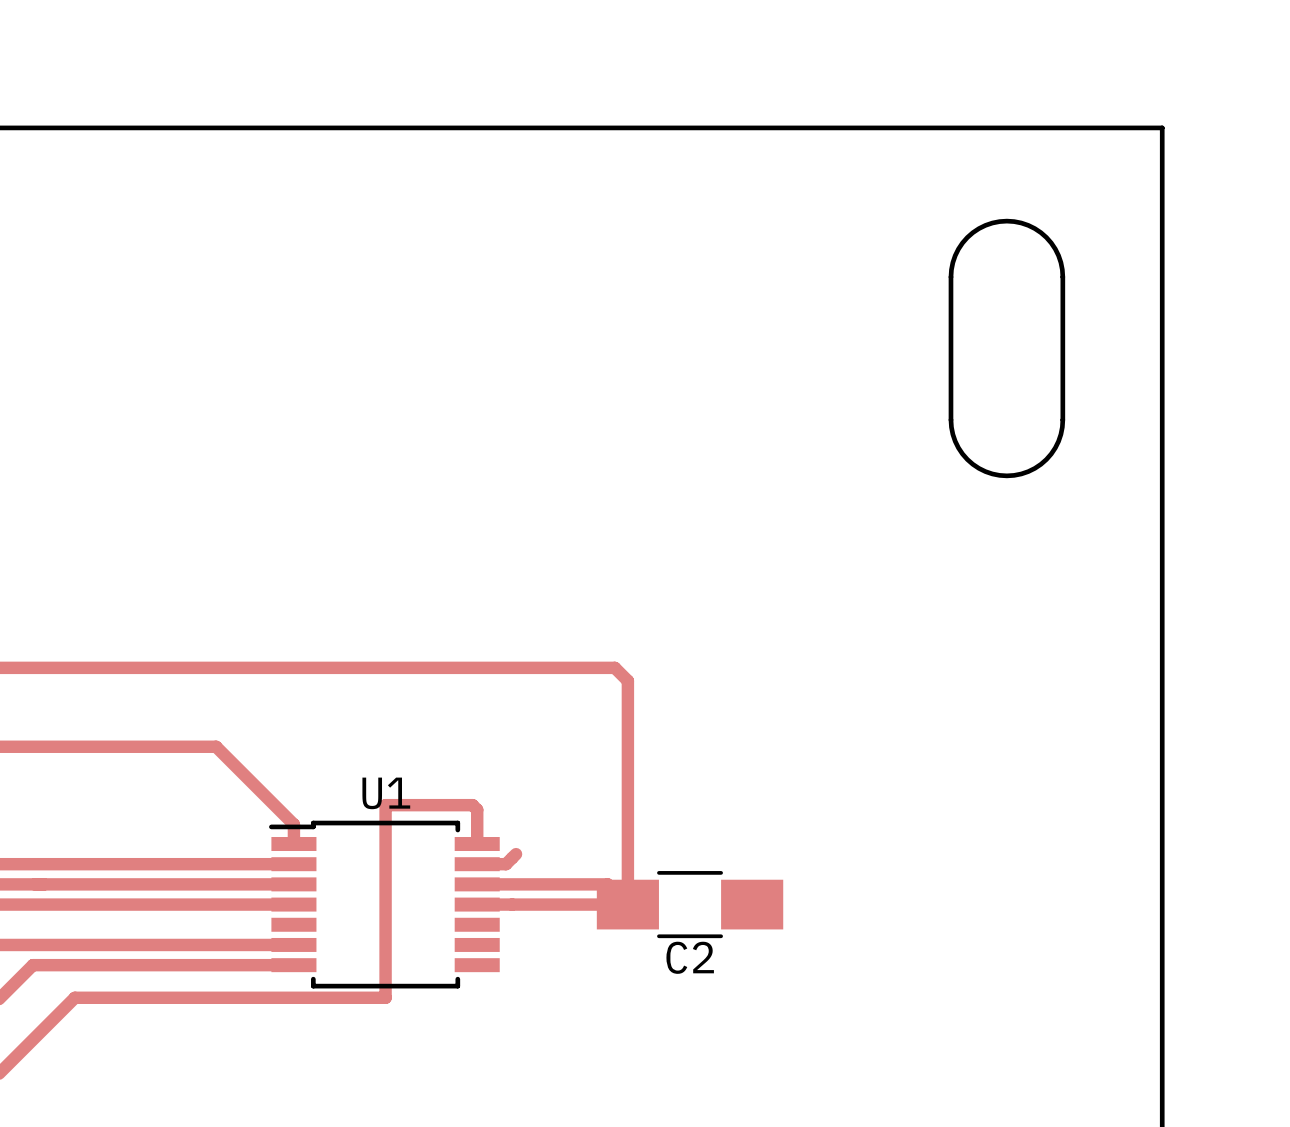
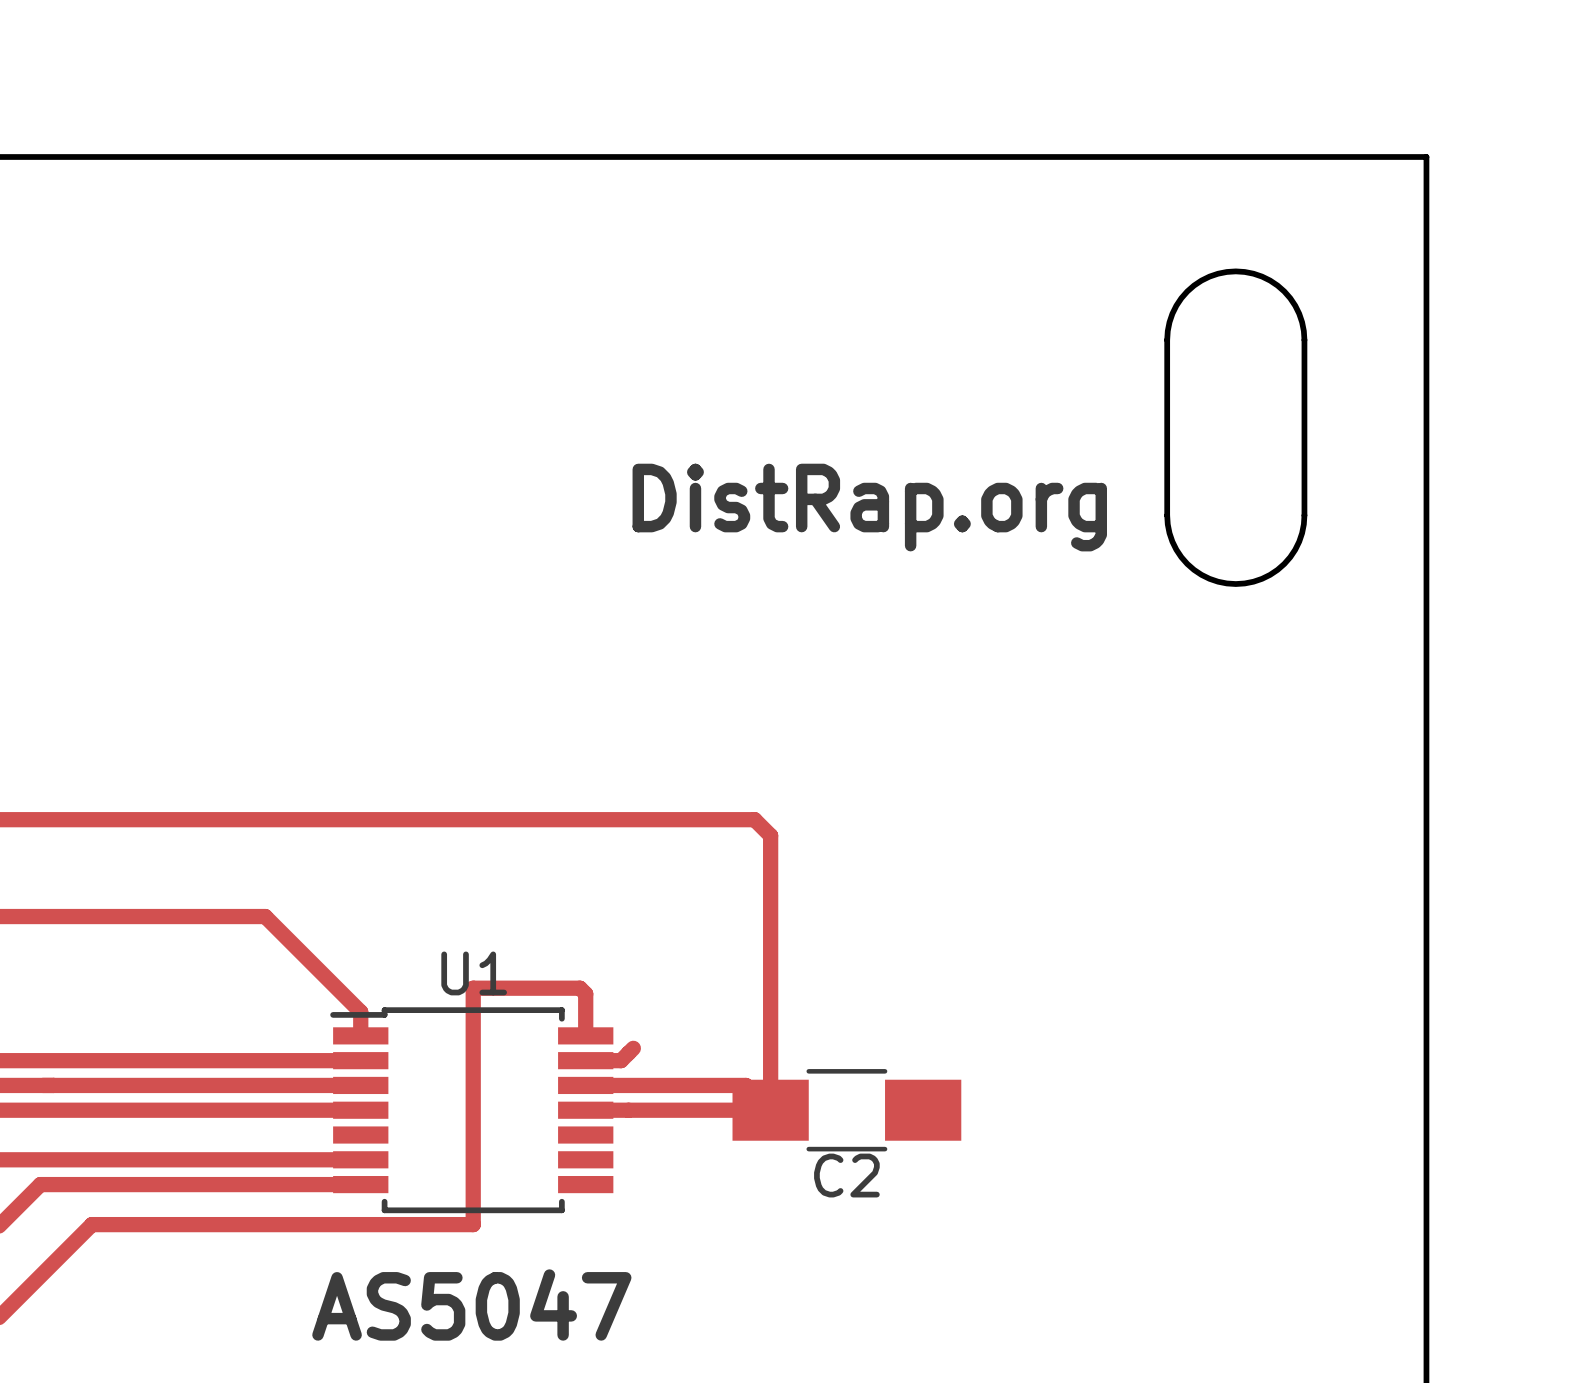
text: none -> DistRap.org (869, 507)
text: none -> AS5047 (471, 1305)

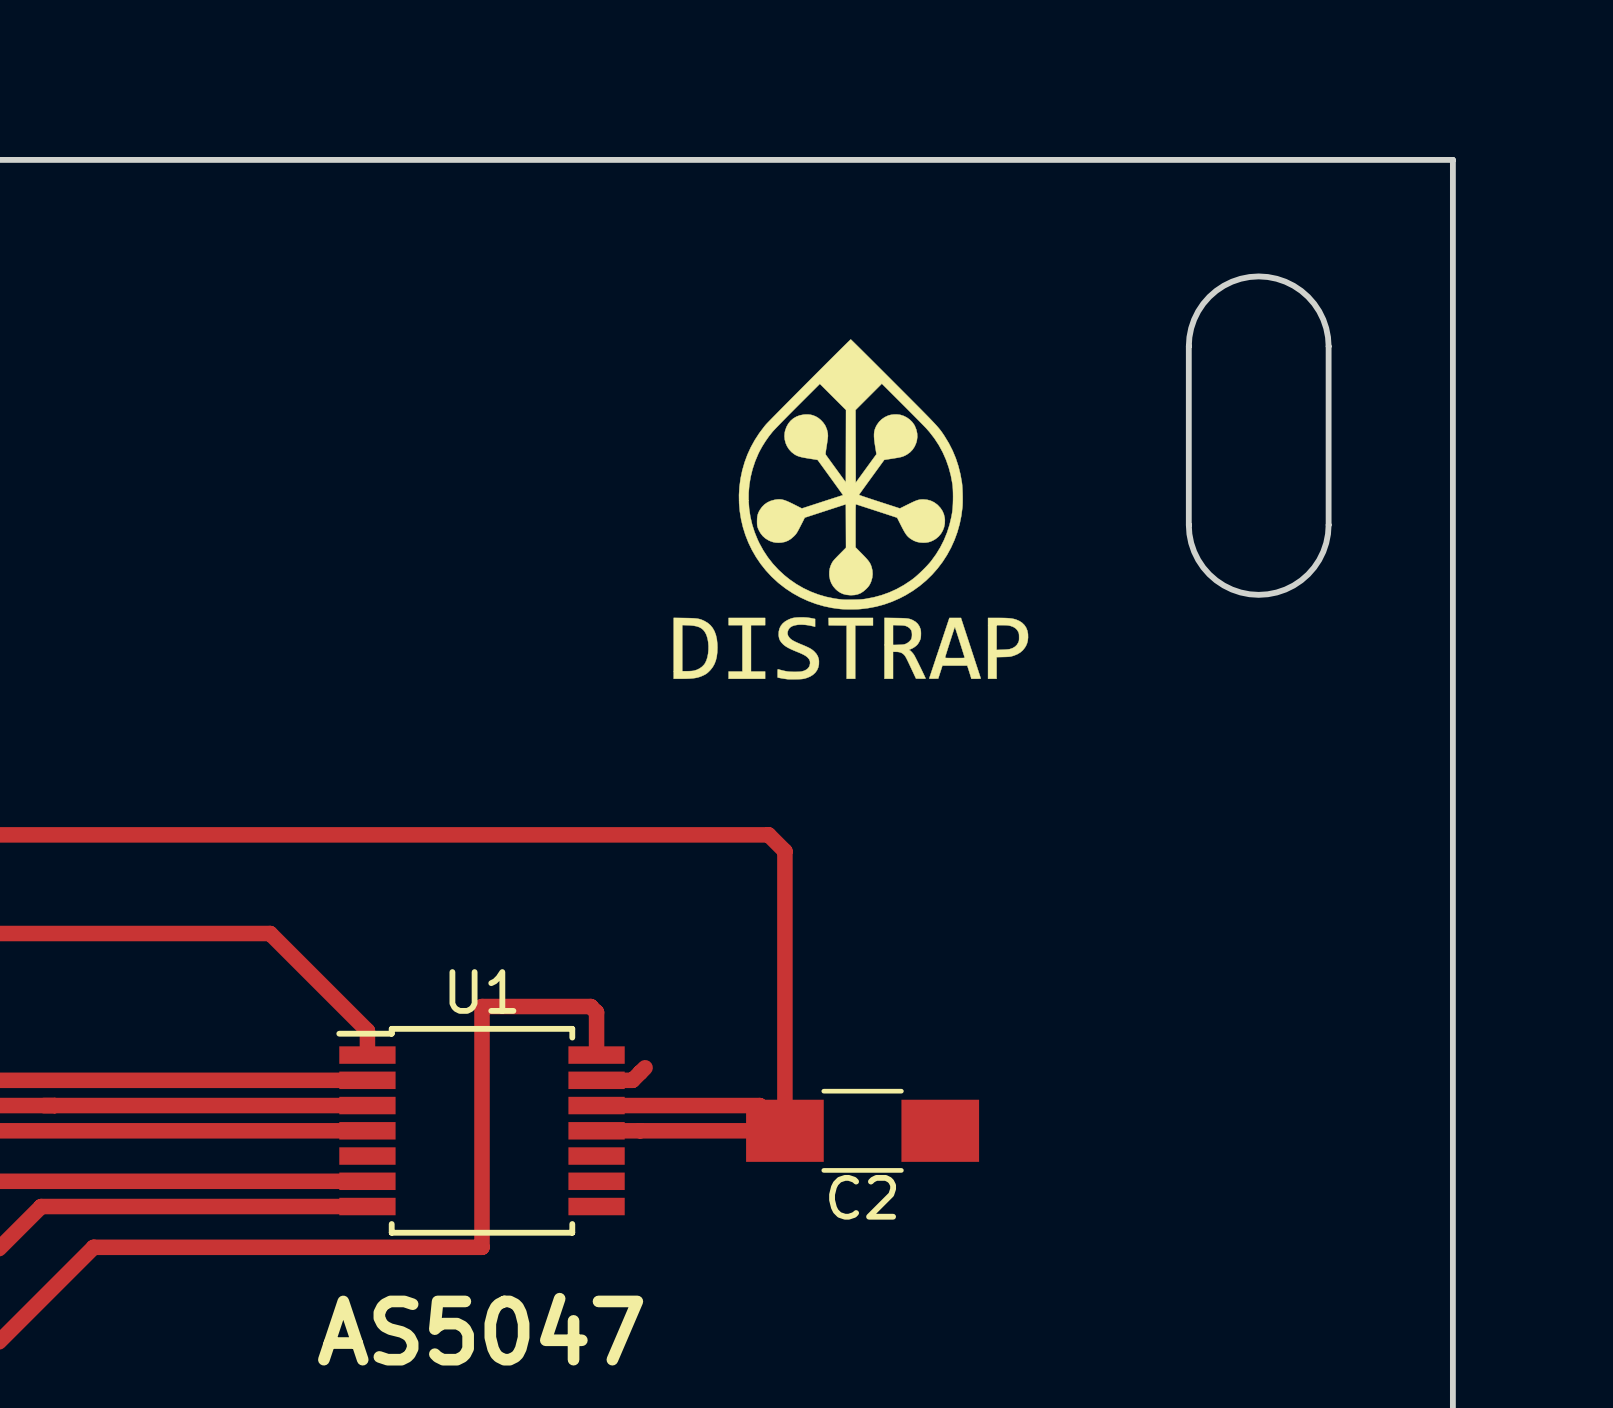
drawing: none -> [673, 339, 1029, 680]
text: DistRap.org (869, 507) -> none

